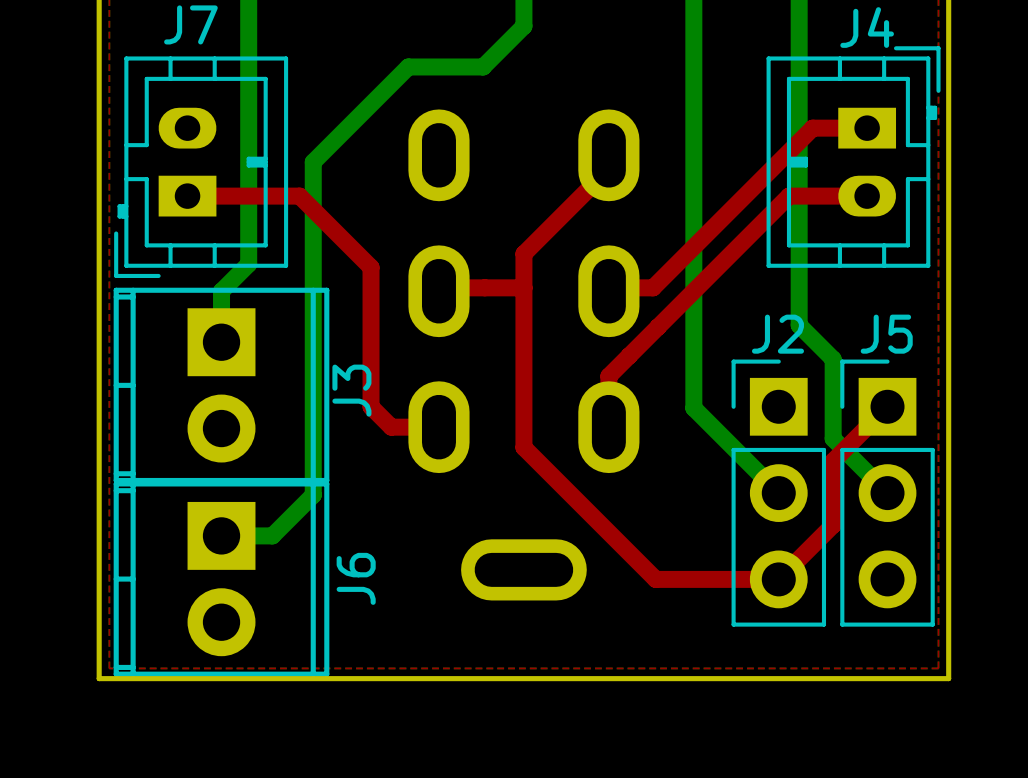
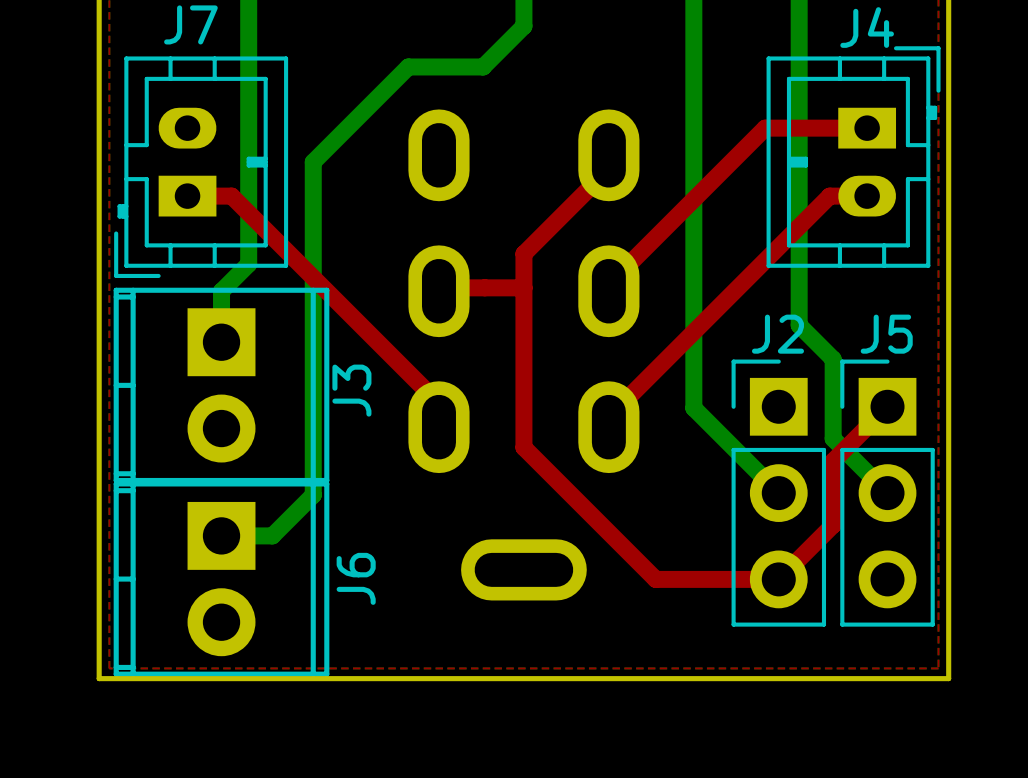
top track: (812, 128) (653, 287) (608, 287) -> (812, 128) (765, 128) (608, 284) (608, 287)
top track: (231, 196) (299, 196) (371, 267) (371, 406) (391, 427) (438, 427) -> (231, 196) (438, 403) (438, 423)
top track: (829, 196) (788, 196) (608, 376) (608, 416) -> (829, 196) (608, 416)

